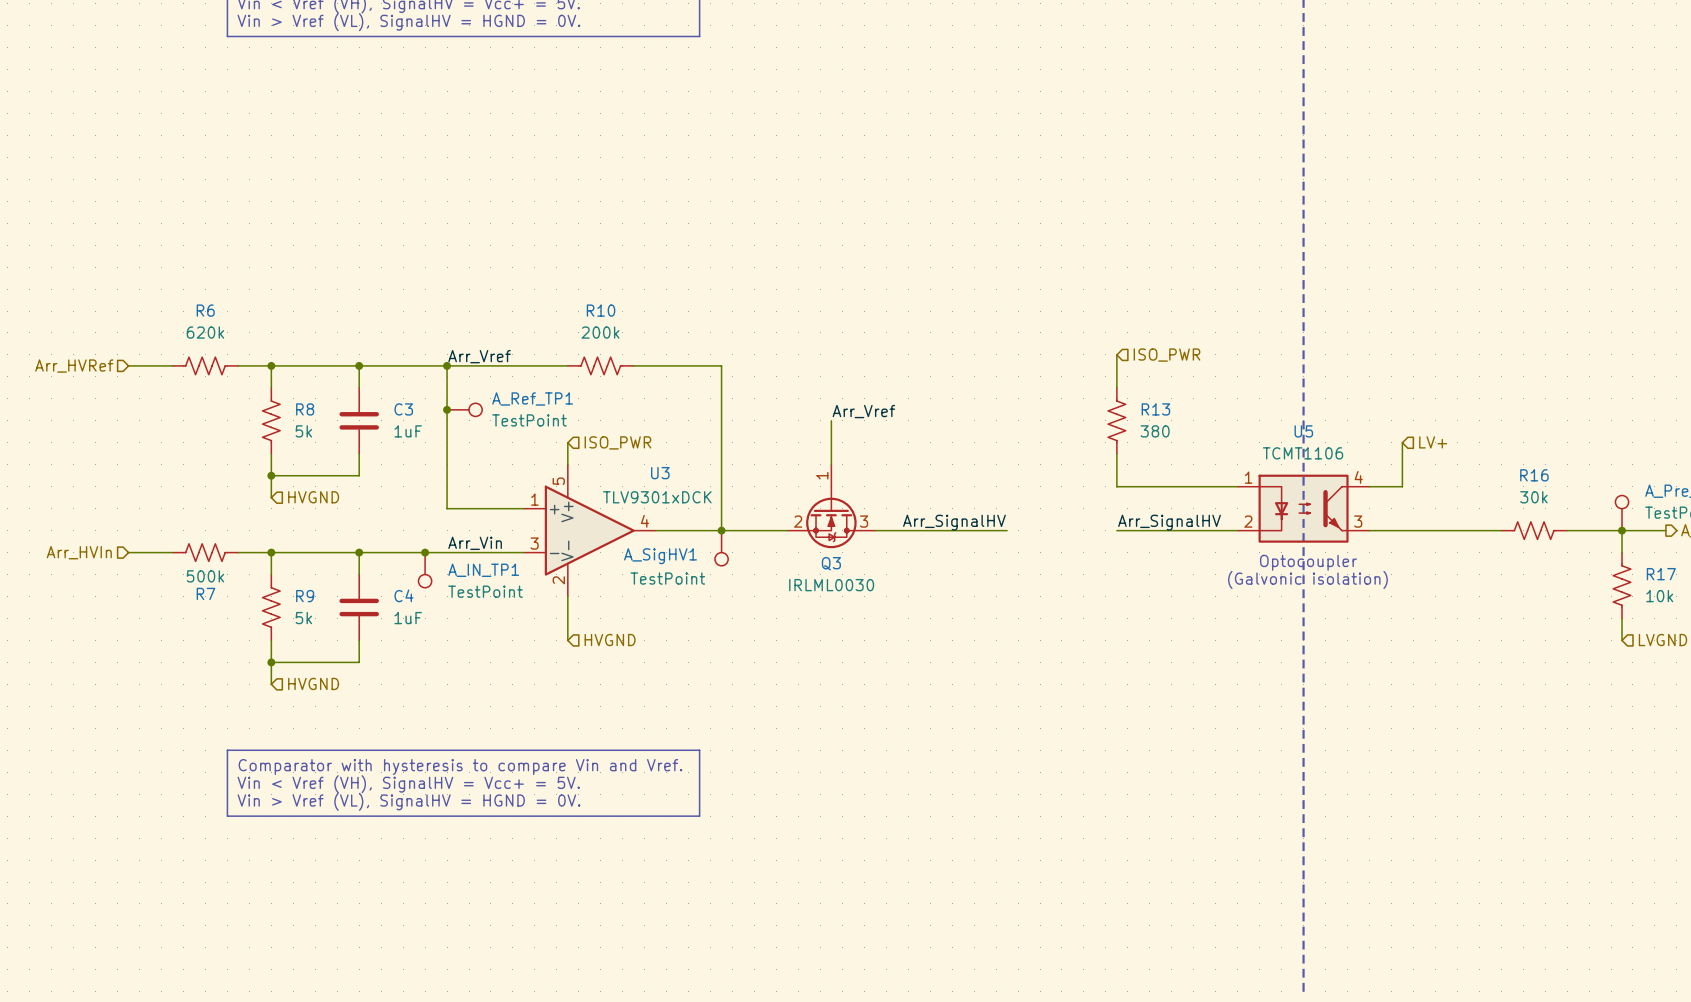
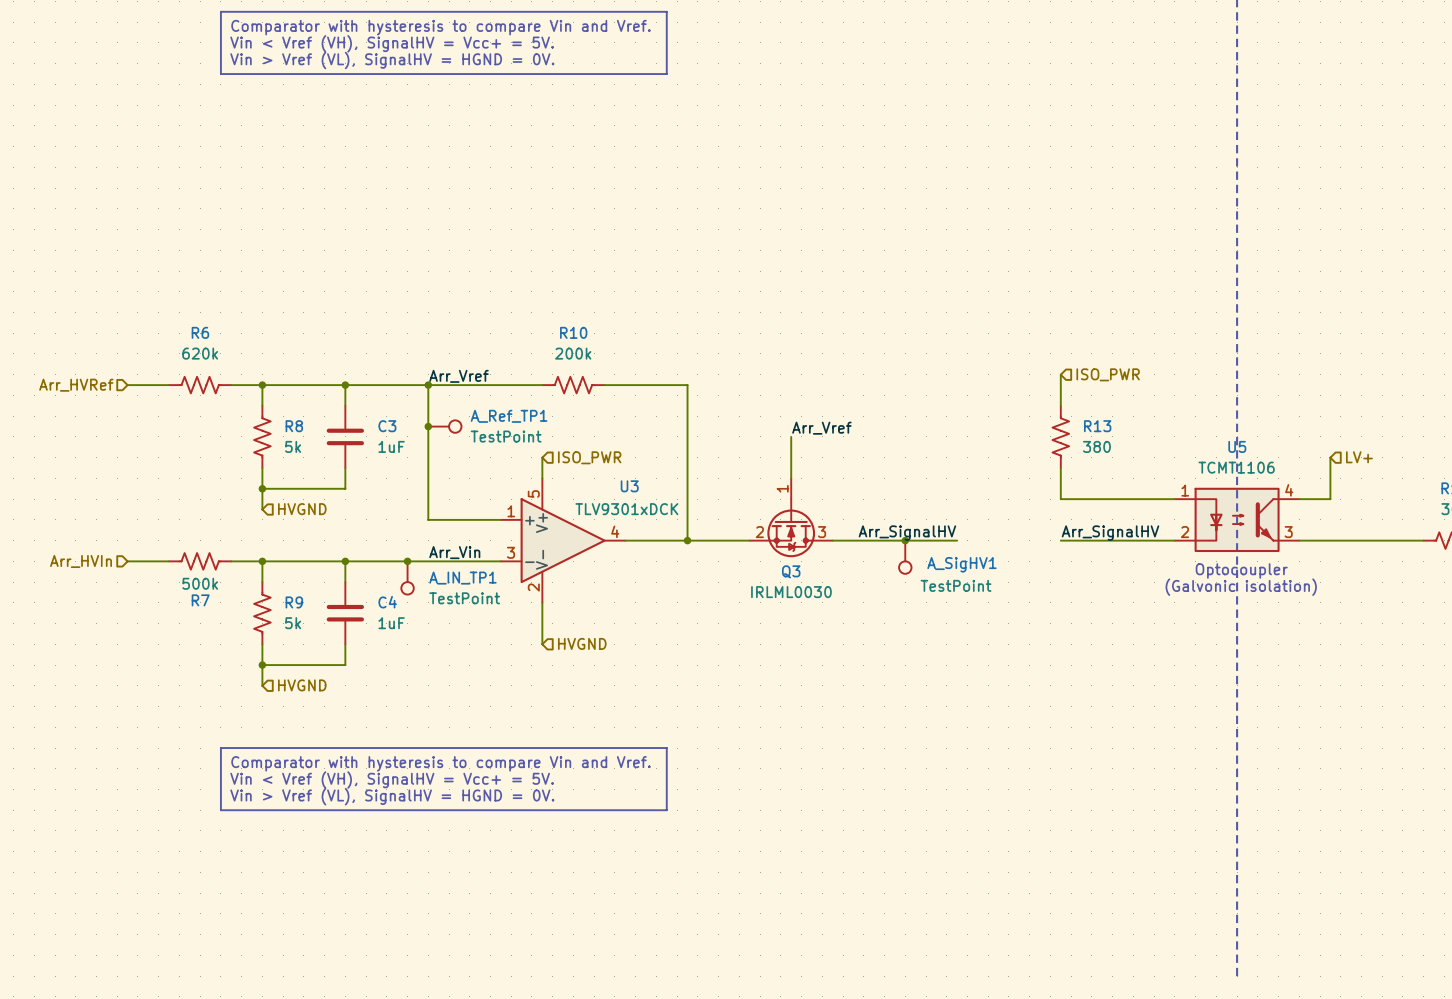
junction: none -> (905, 540)
A_SigHV1 position: (721, 548) -> (905, 557)
A_SigHV1 name position: A_SigHV1 (660, 556) -> A_SigHV1 (961, 564)
A_SigHV1 value position: TestPoint (667, 578) -> TestPoint (956, 585)

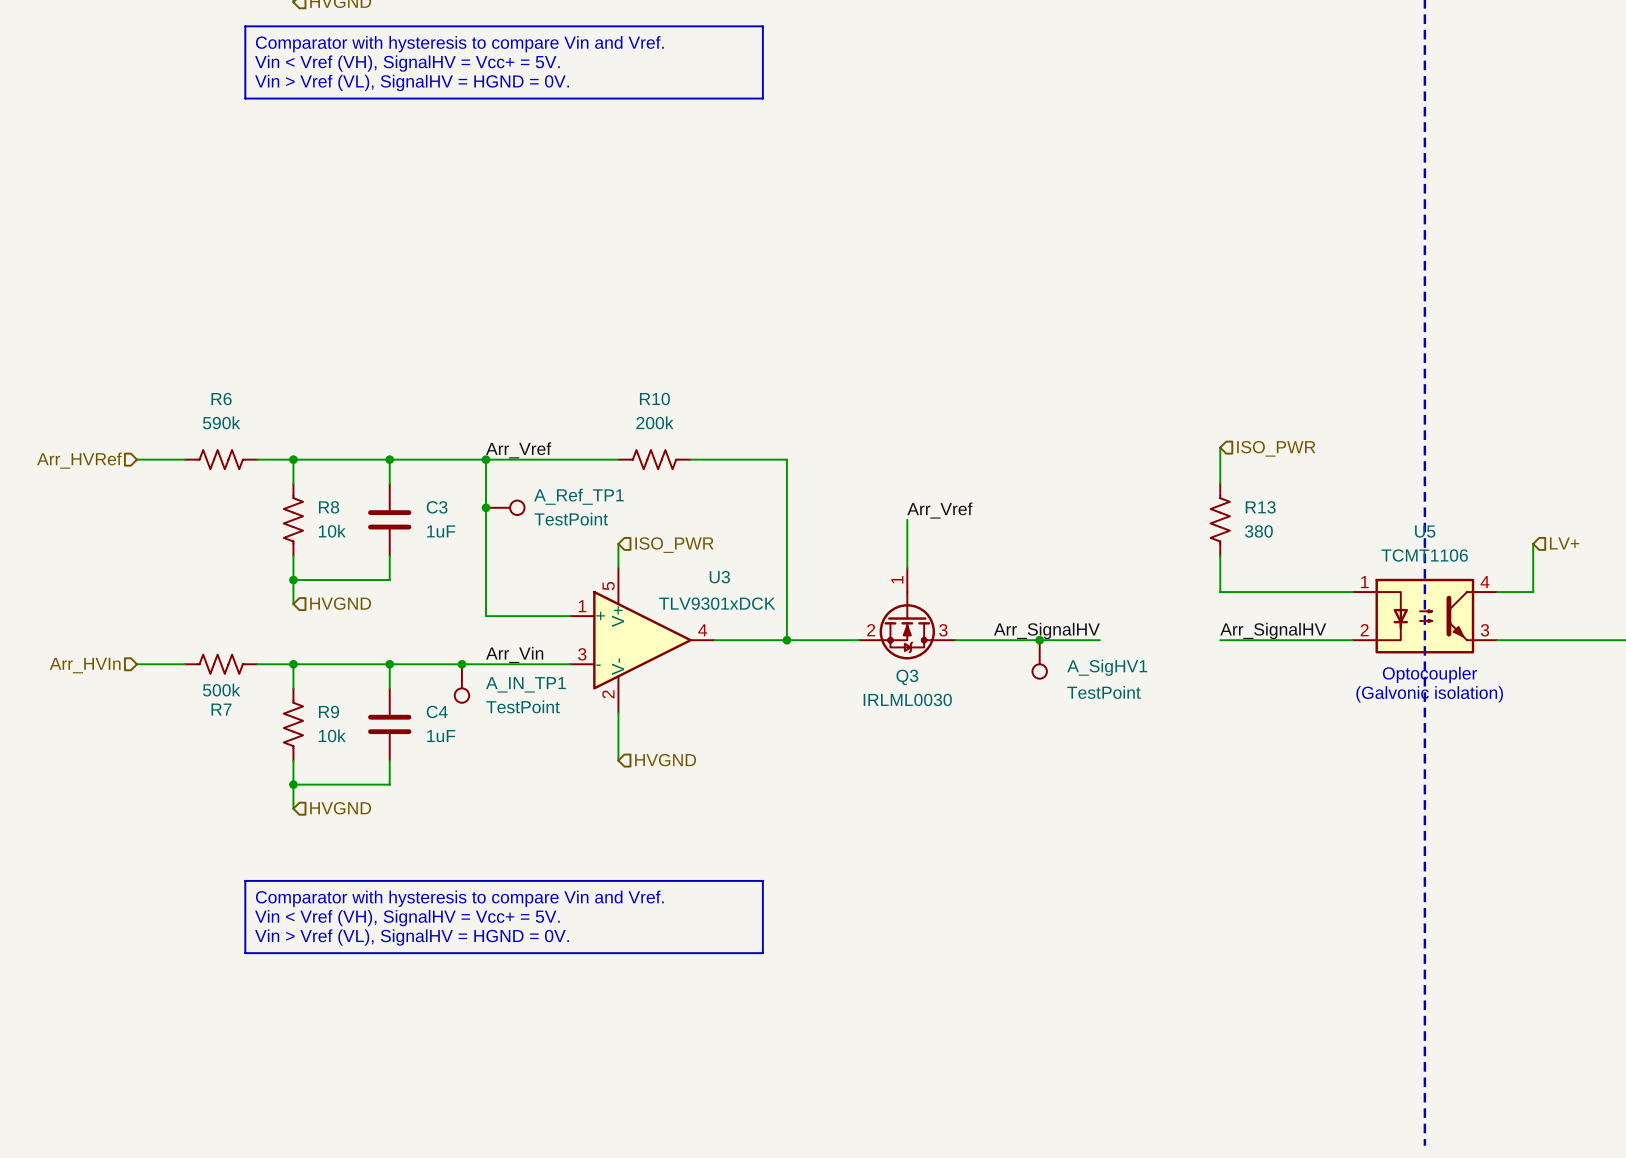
R6 value: 620k (200, 353) -> 590k (221, 422)
R8 value: 5k (293, 446) -> 10k (332, 531)
R9 value: 5k (293, 623) -> 10k (332, 735)

